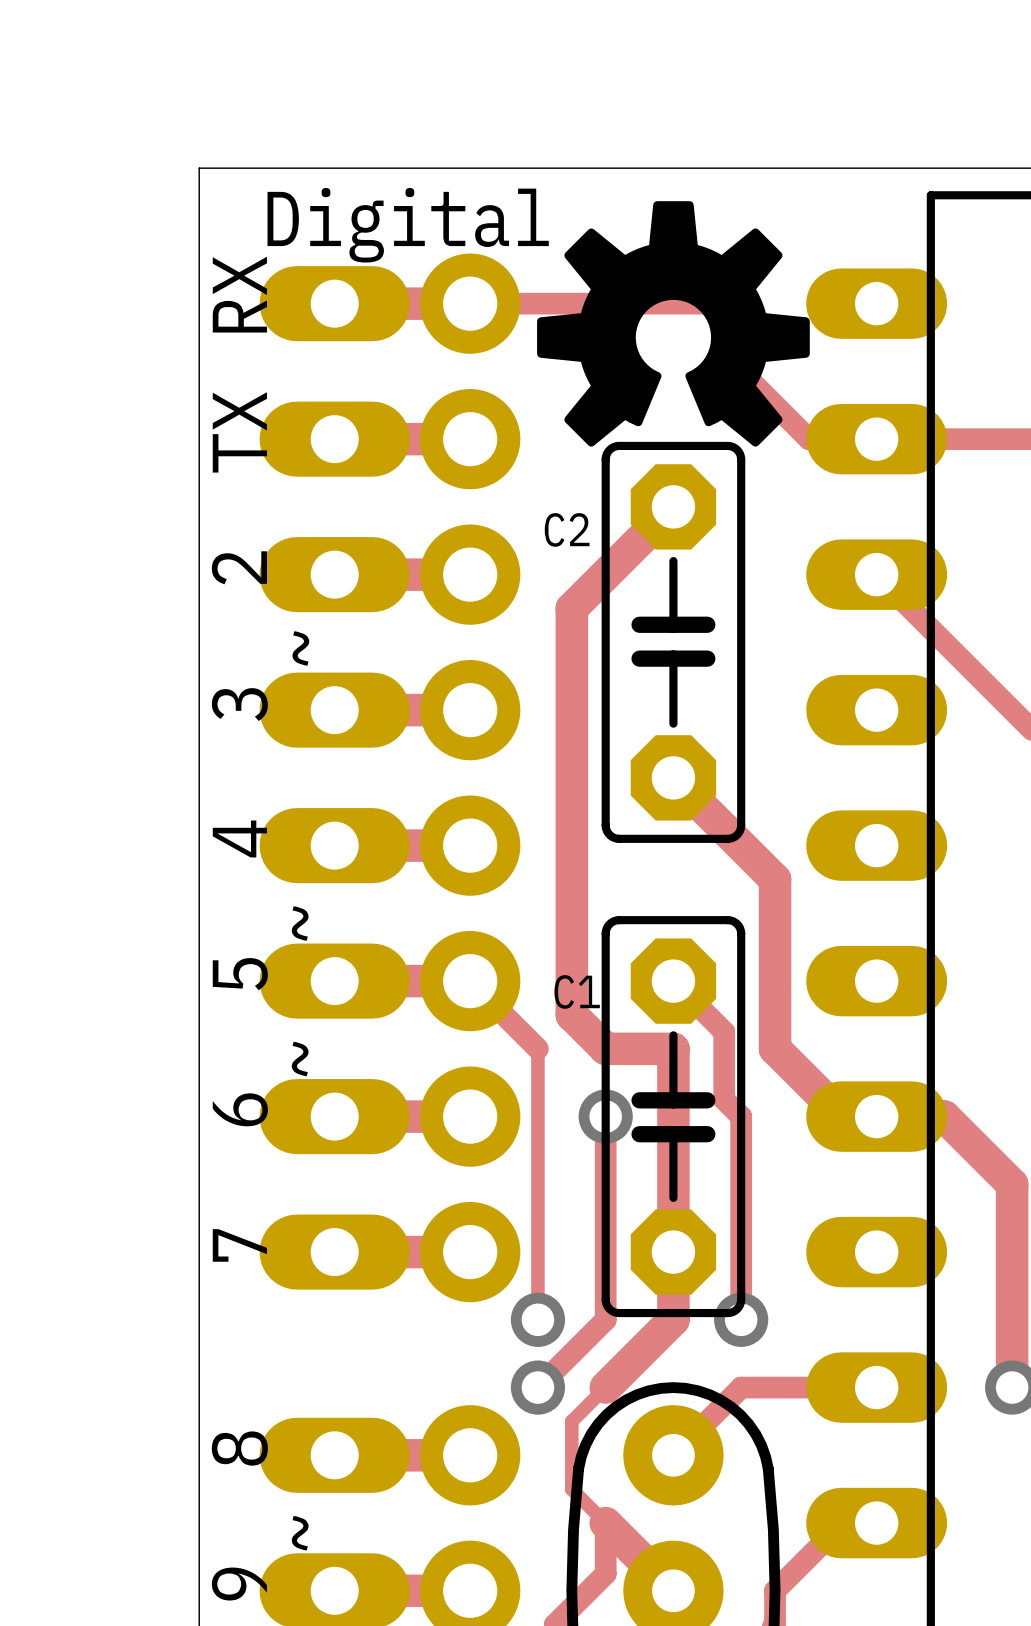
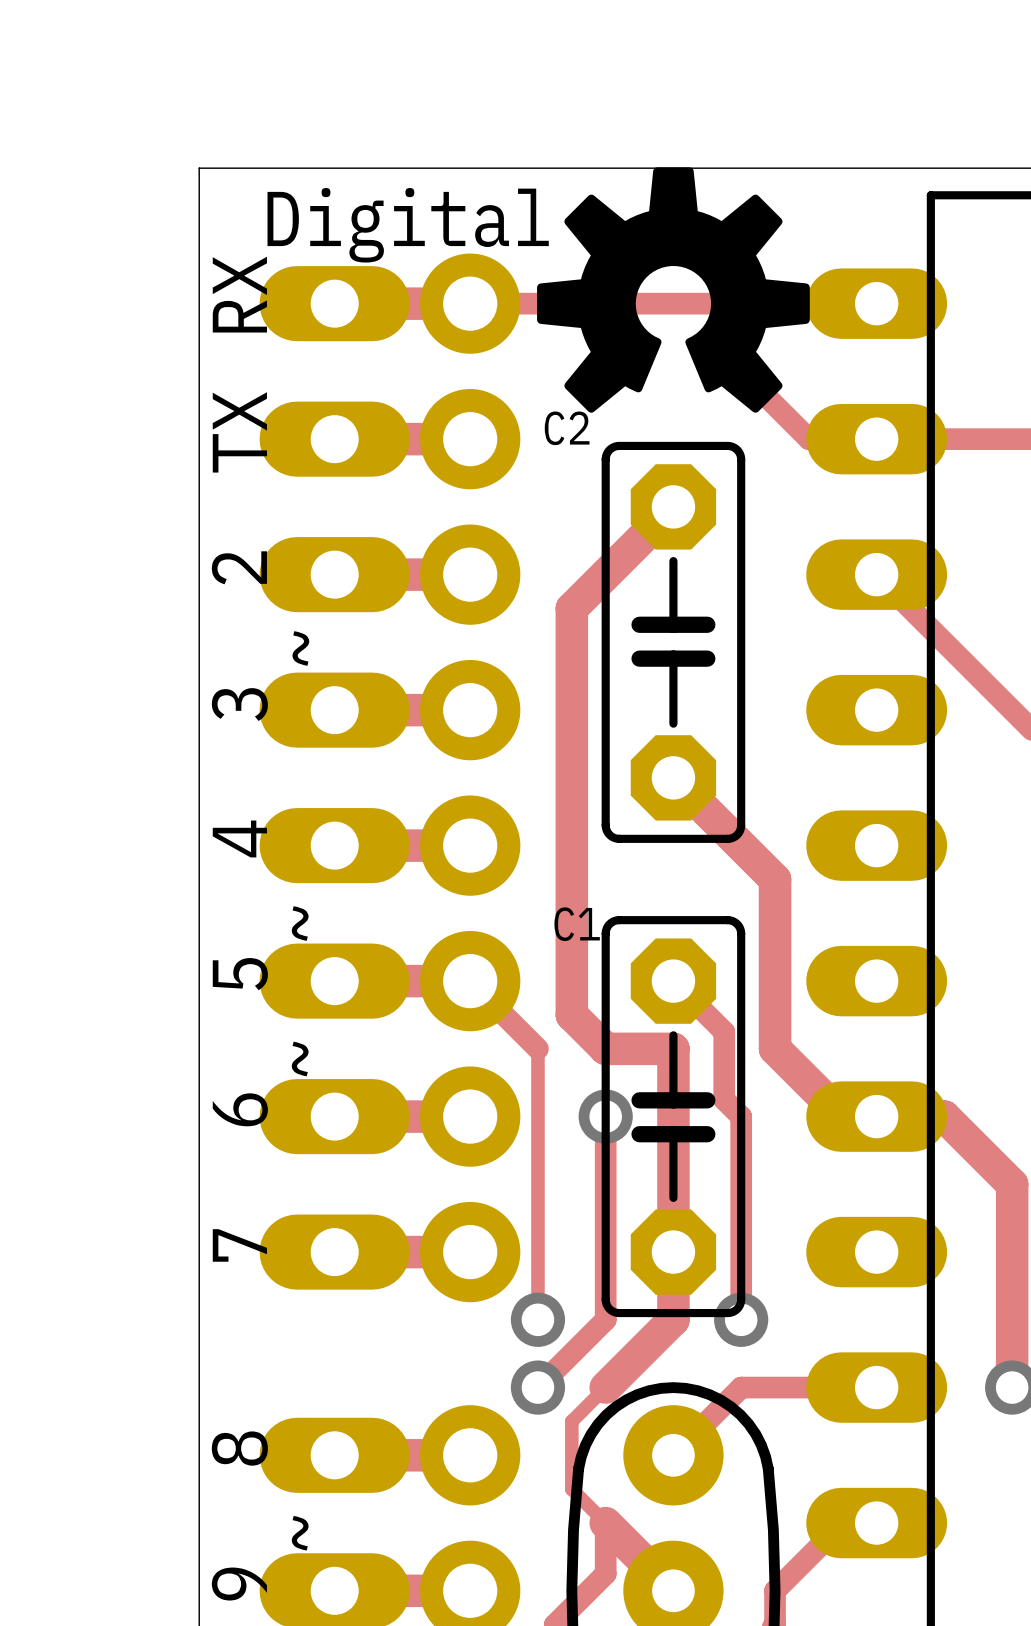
drawing position: (673, 323) -> (673, 290)
C2 name position: C2 (567, 529) -> C2 (567, 428)
C1 name position: C1 (577, 991) -> C1 (577, 924)

